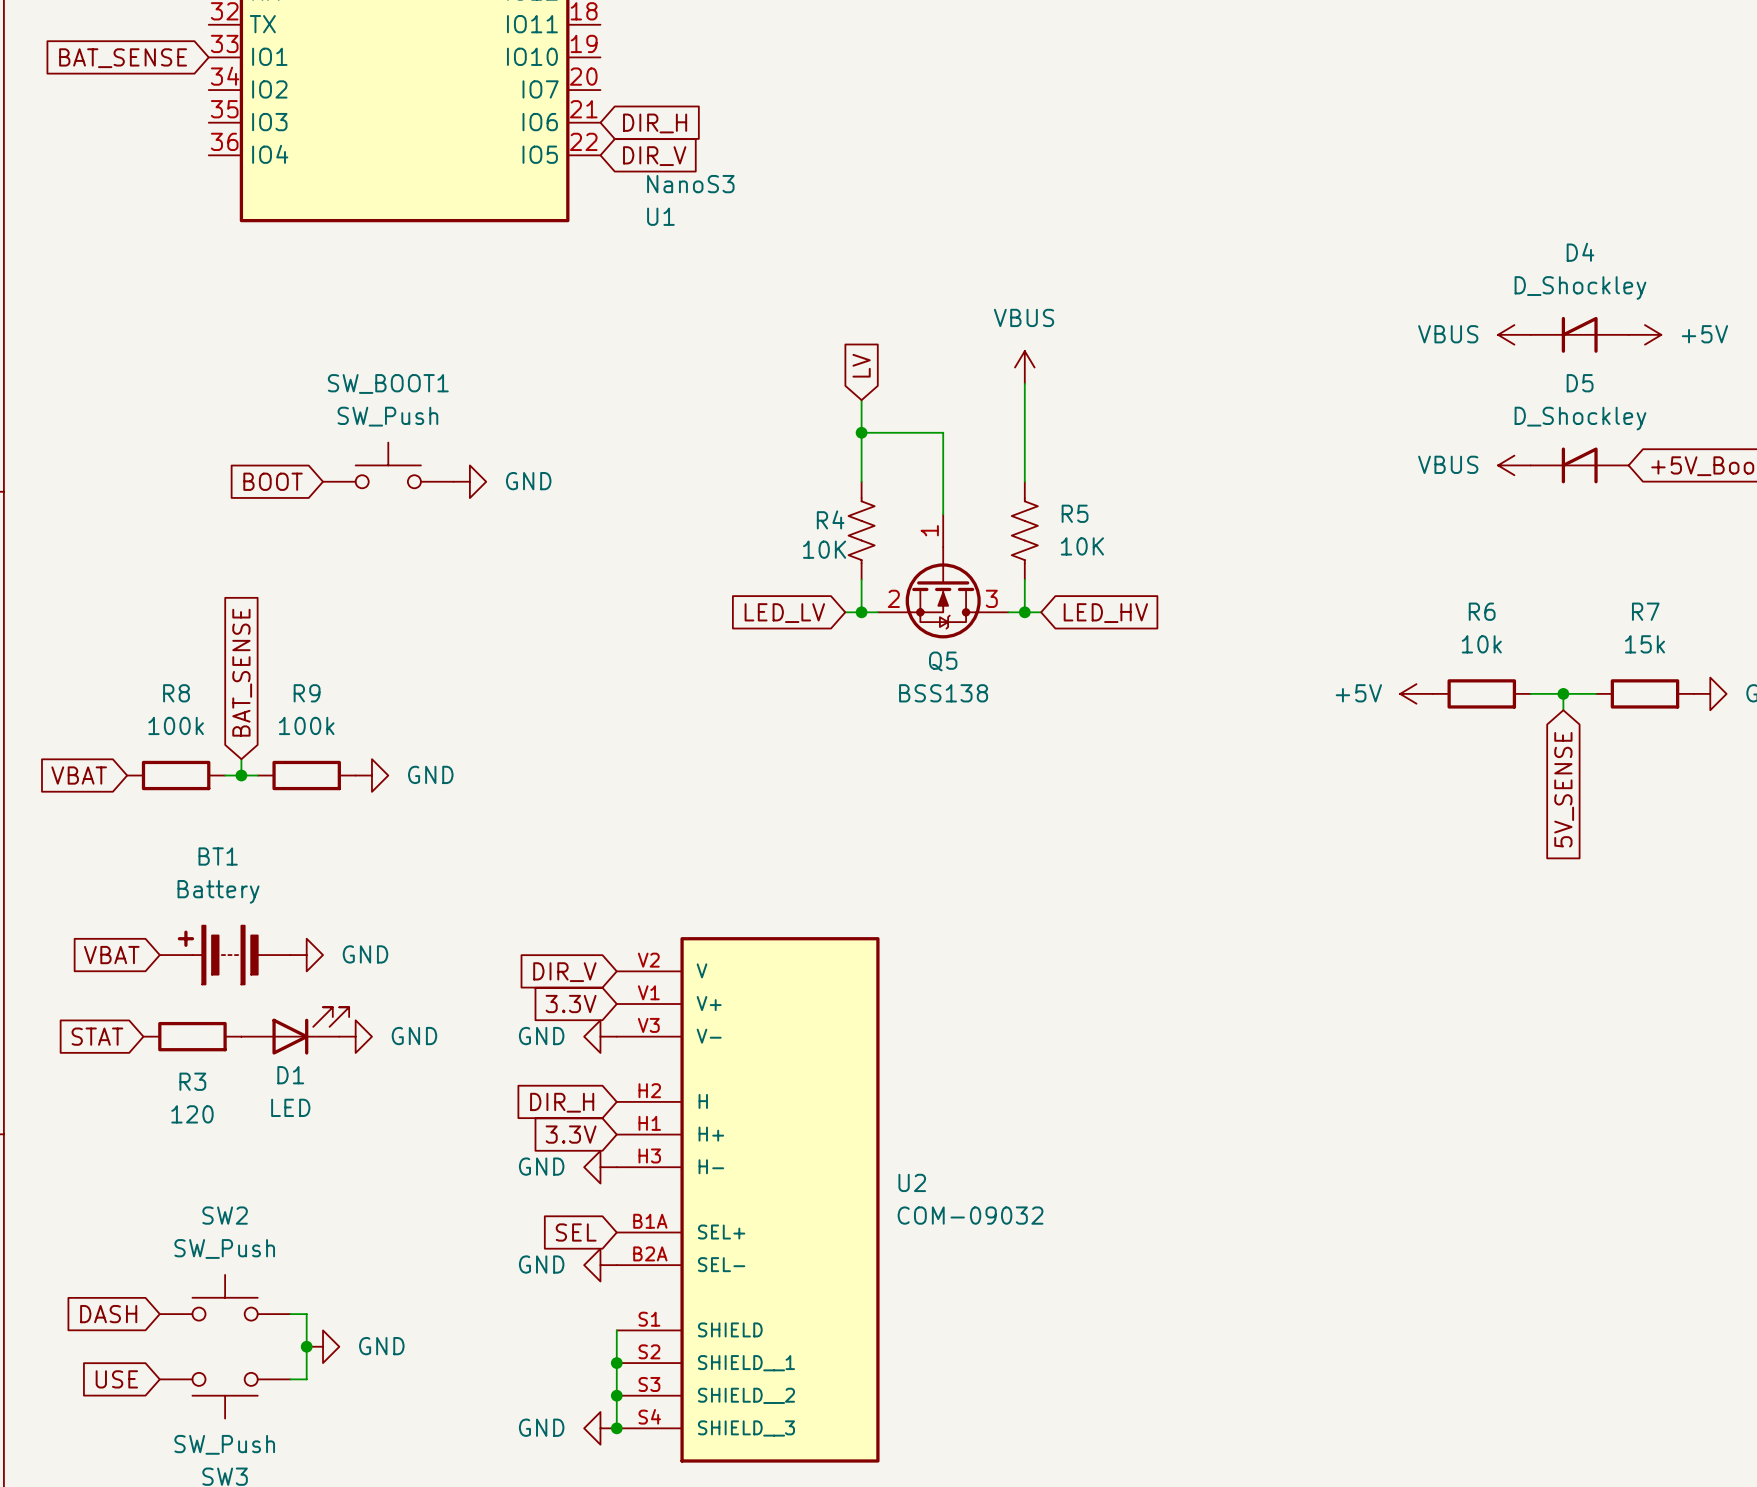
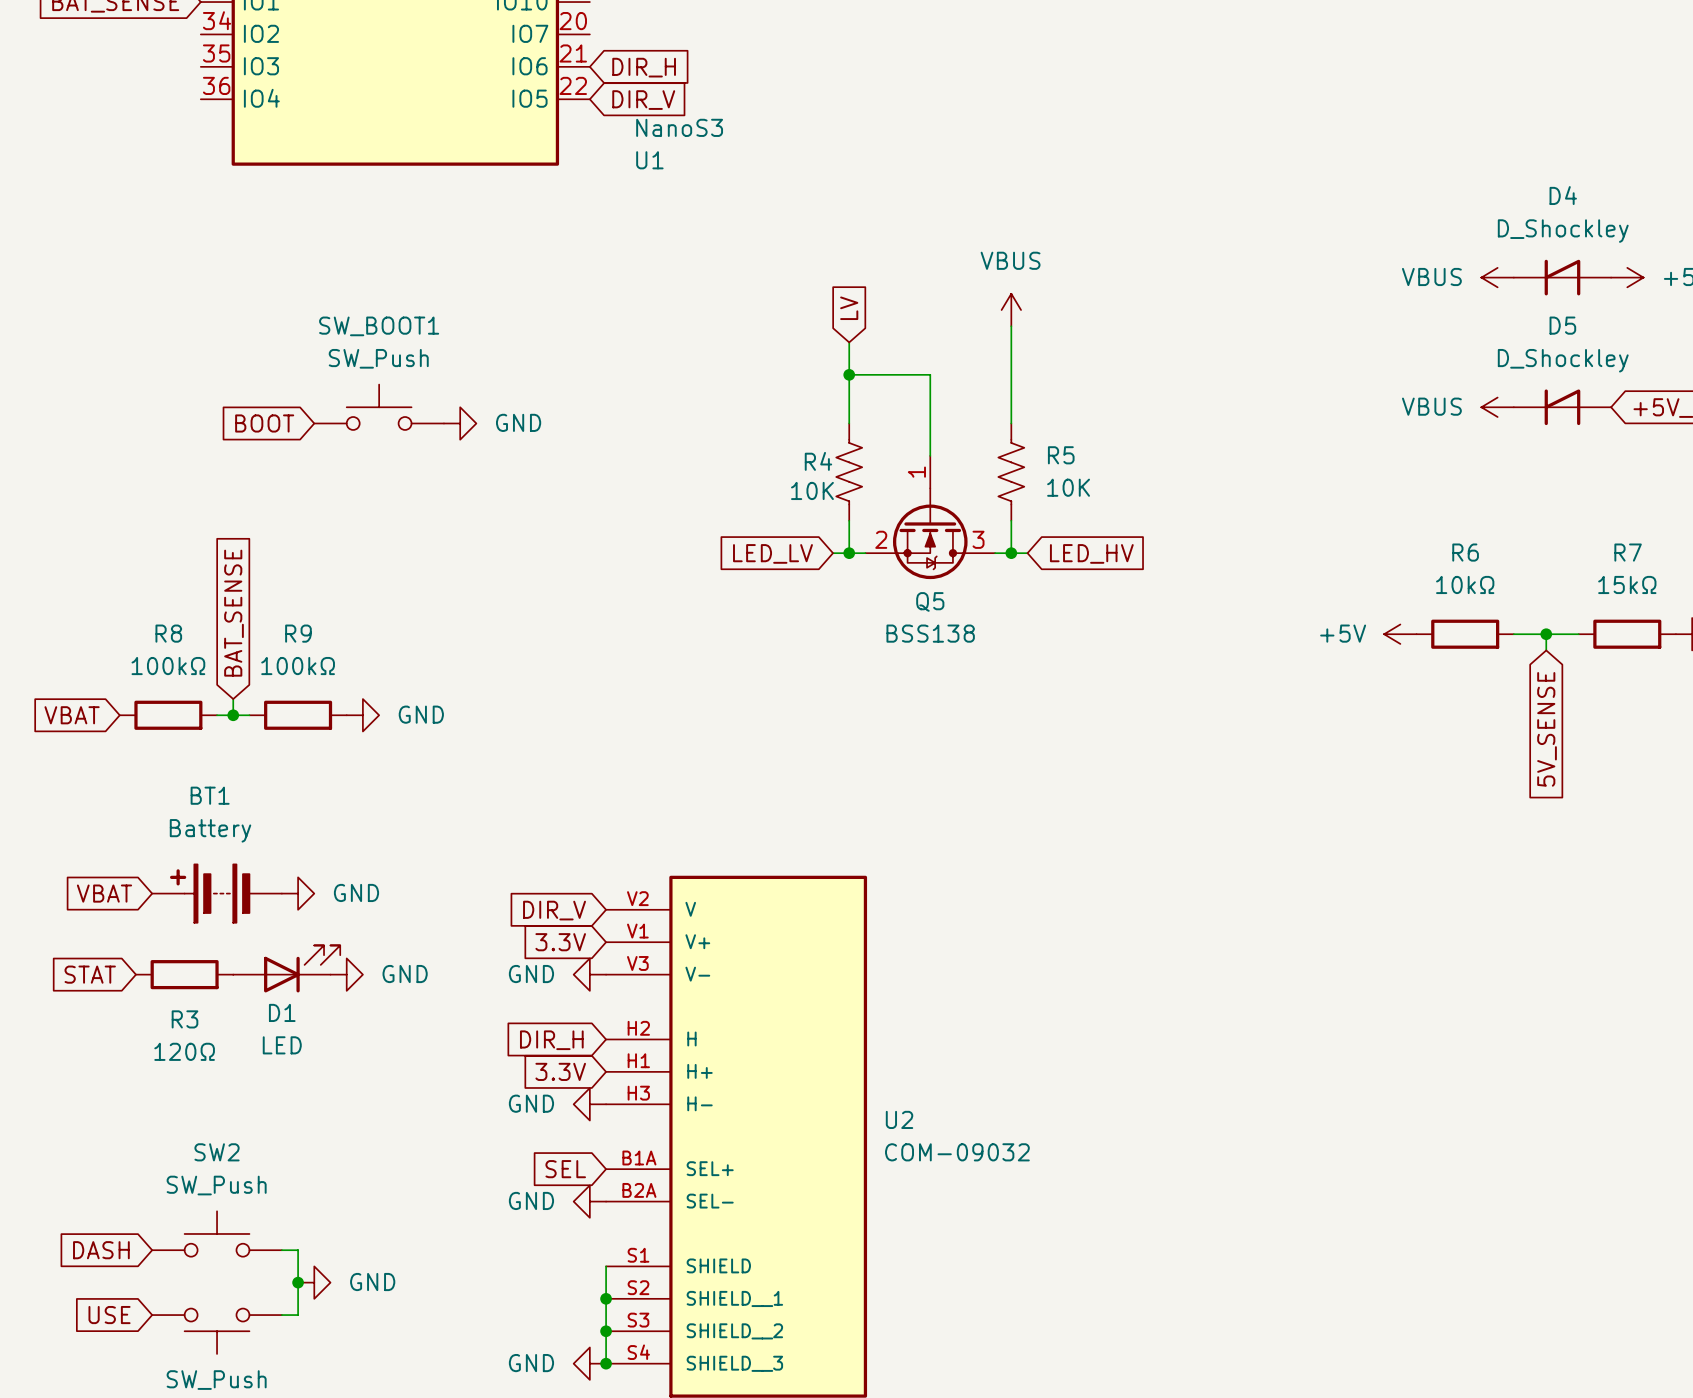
R6 value: 10k (1481, 644) -> 10kΩ (1465, 584)
R7 value: 15k (1644, 644) -> 15kΩ (1627, 584)
R8 value: 100k (176, 725) -> 100kΩ (168, 666)
R9 value: 100k (306, 725) -> 100kΩ (298, 666)
R3 value: 120 (192, 1114) -> 120Ω (184, 1051)

